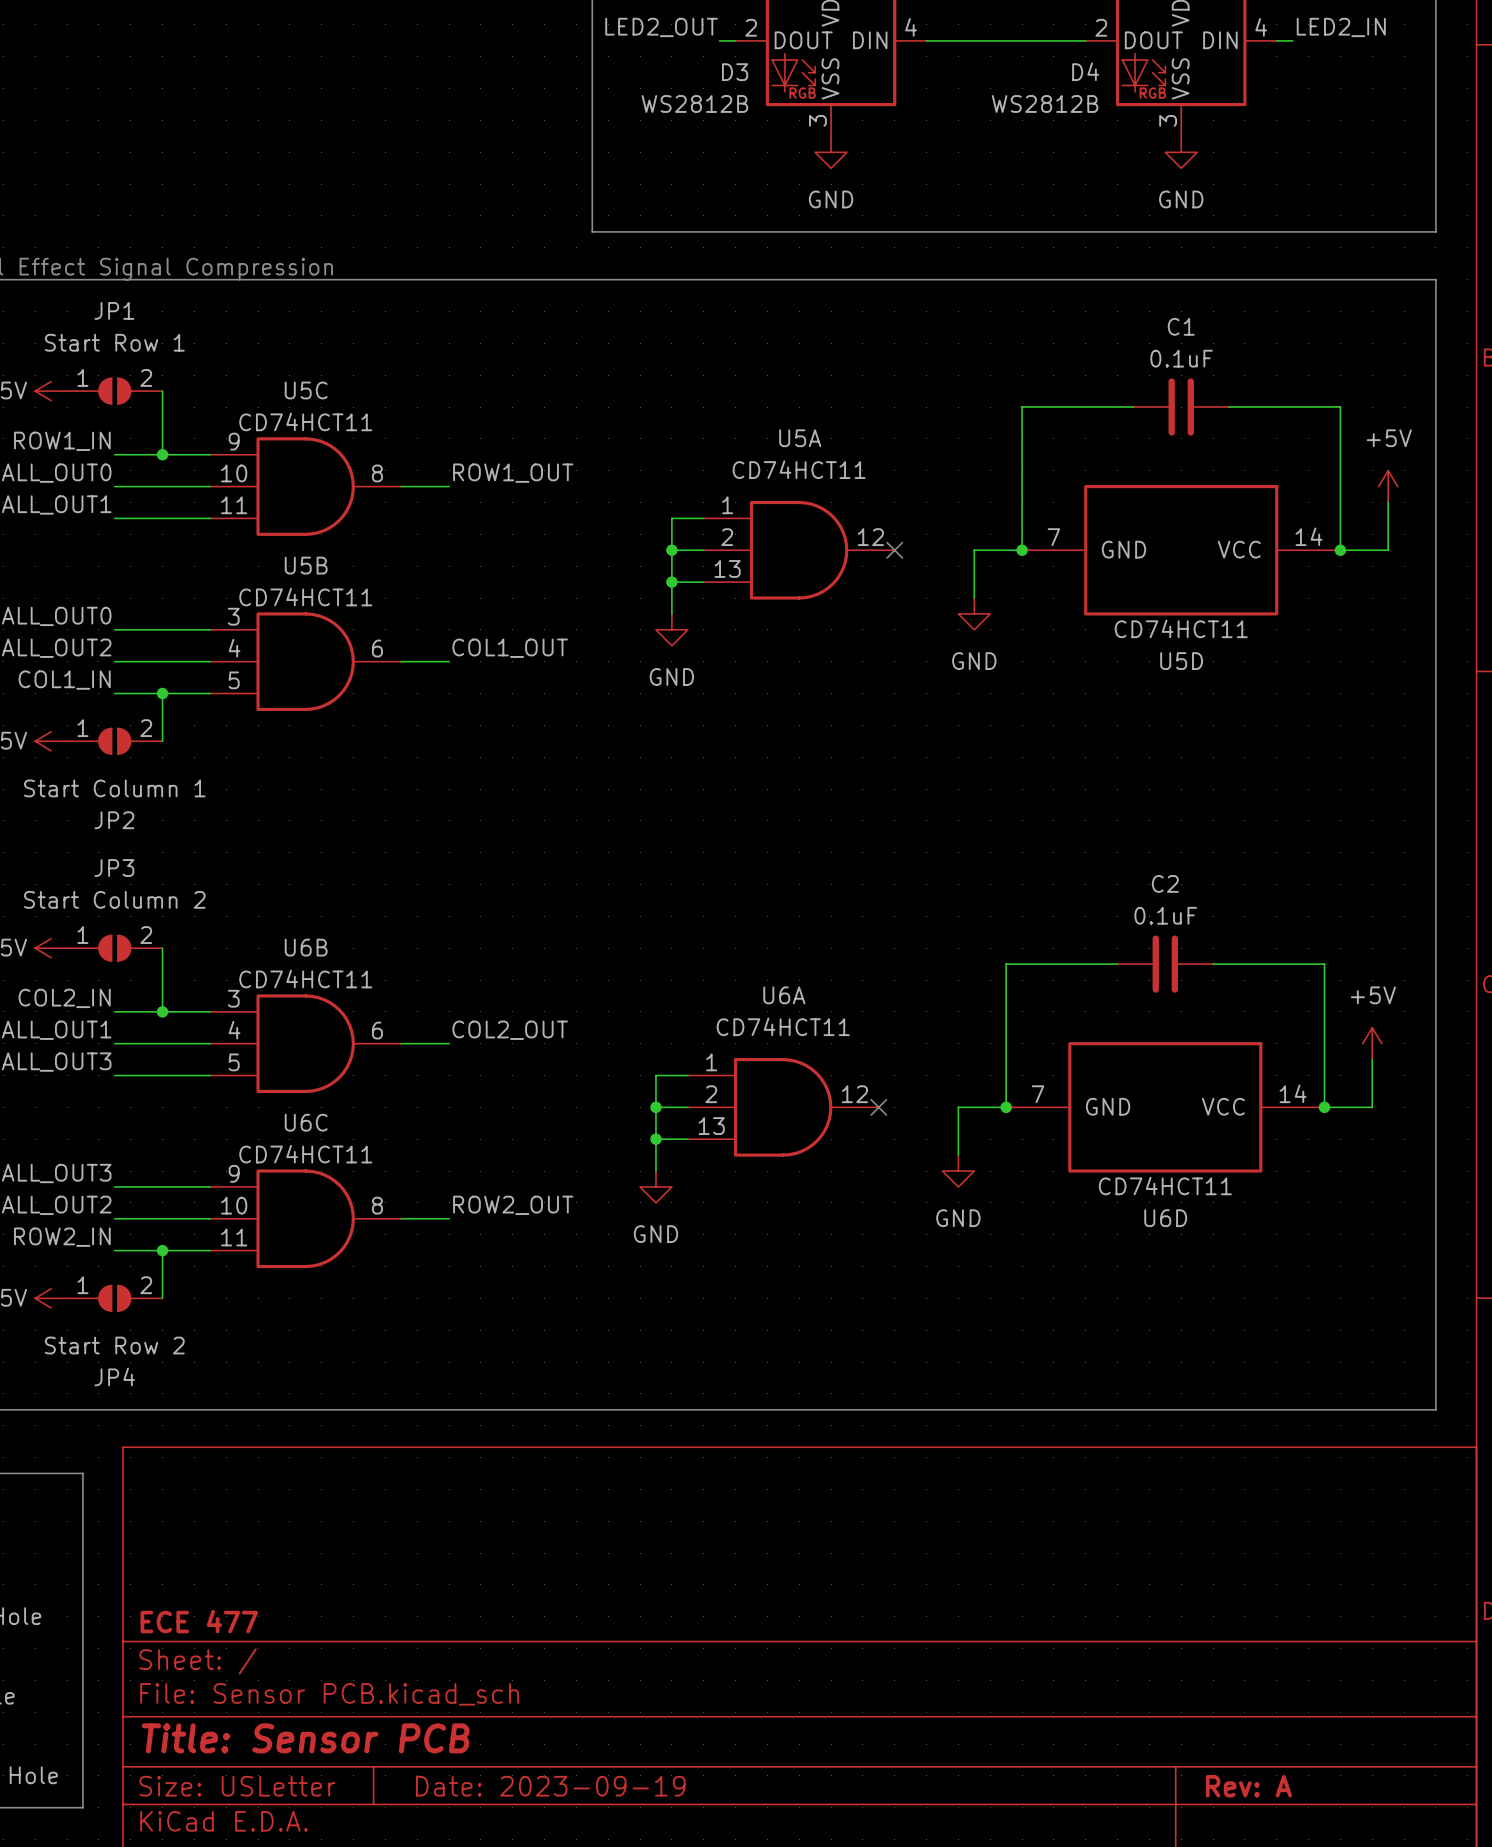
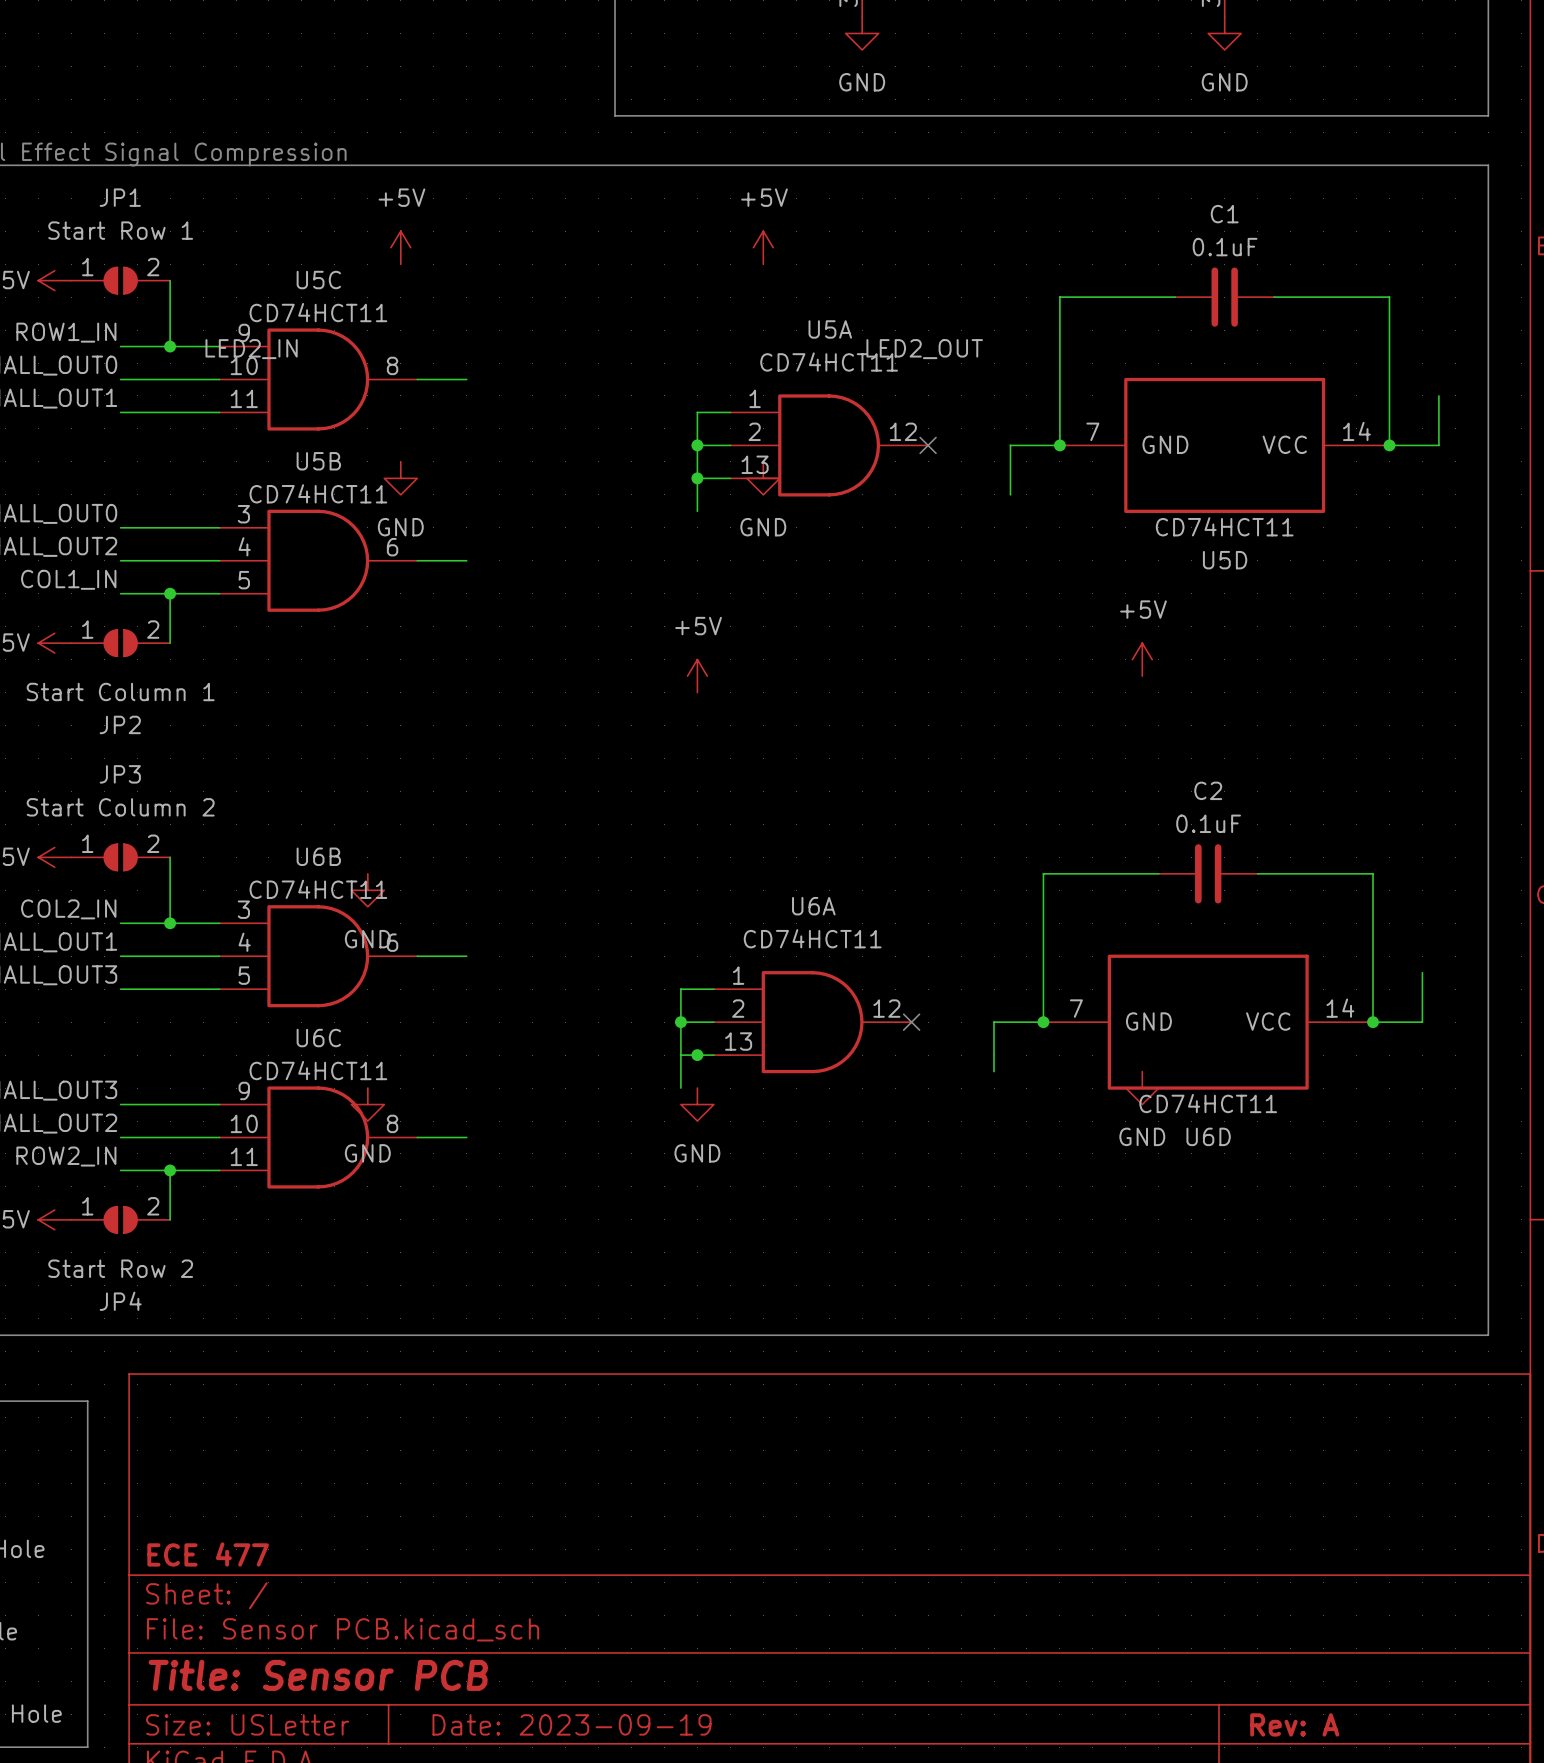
power symbol: none -> +5V (400, 247)
power symbol: none -> +5V (763, 247)
label: none -> LED2_IN (251, 349)
label: none -> LED2_OUT (924, 349)
label: ROW1_OUT (513, 473) -> none
power symbol: +5V (1388, 486) -> none
power symbol: none -> GND (400, 478)
power symbol: GND (974, 613) -> none
power symbol position: GND (671, 629) -> GND (763, 478)
label: COL1_OUT (510, 648) -> none
power symbol: none -> +5V (1142, 659)
power symbol: none -> +5V (697, 676)
power symbol: none -> GND (367, 890)
label: COL2_OUT (510, 1030) -> none
power symbol: +5V (1372, 1043) -> none
junction position: (655, 1139) -> (697, 1055)
power symbol position: GND (958, 1171) -> GND (1142, 1088)
power symbol: none -> GND (367, 1104)
power symbol position: GND (655, 1186) -> GND (697, 1104)
label: ROW2_OUT (513, 1205) -> none

